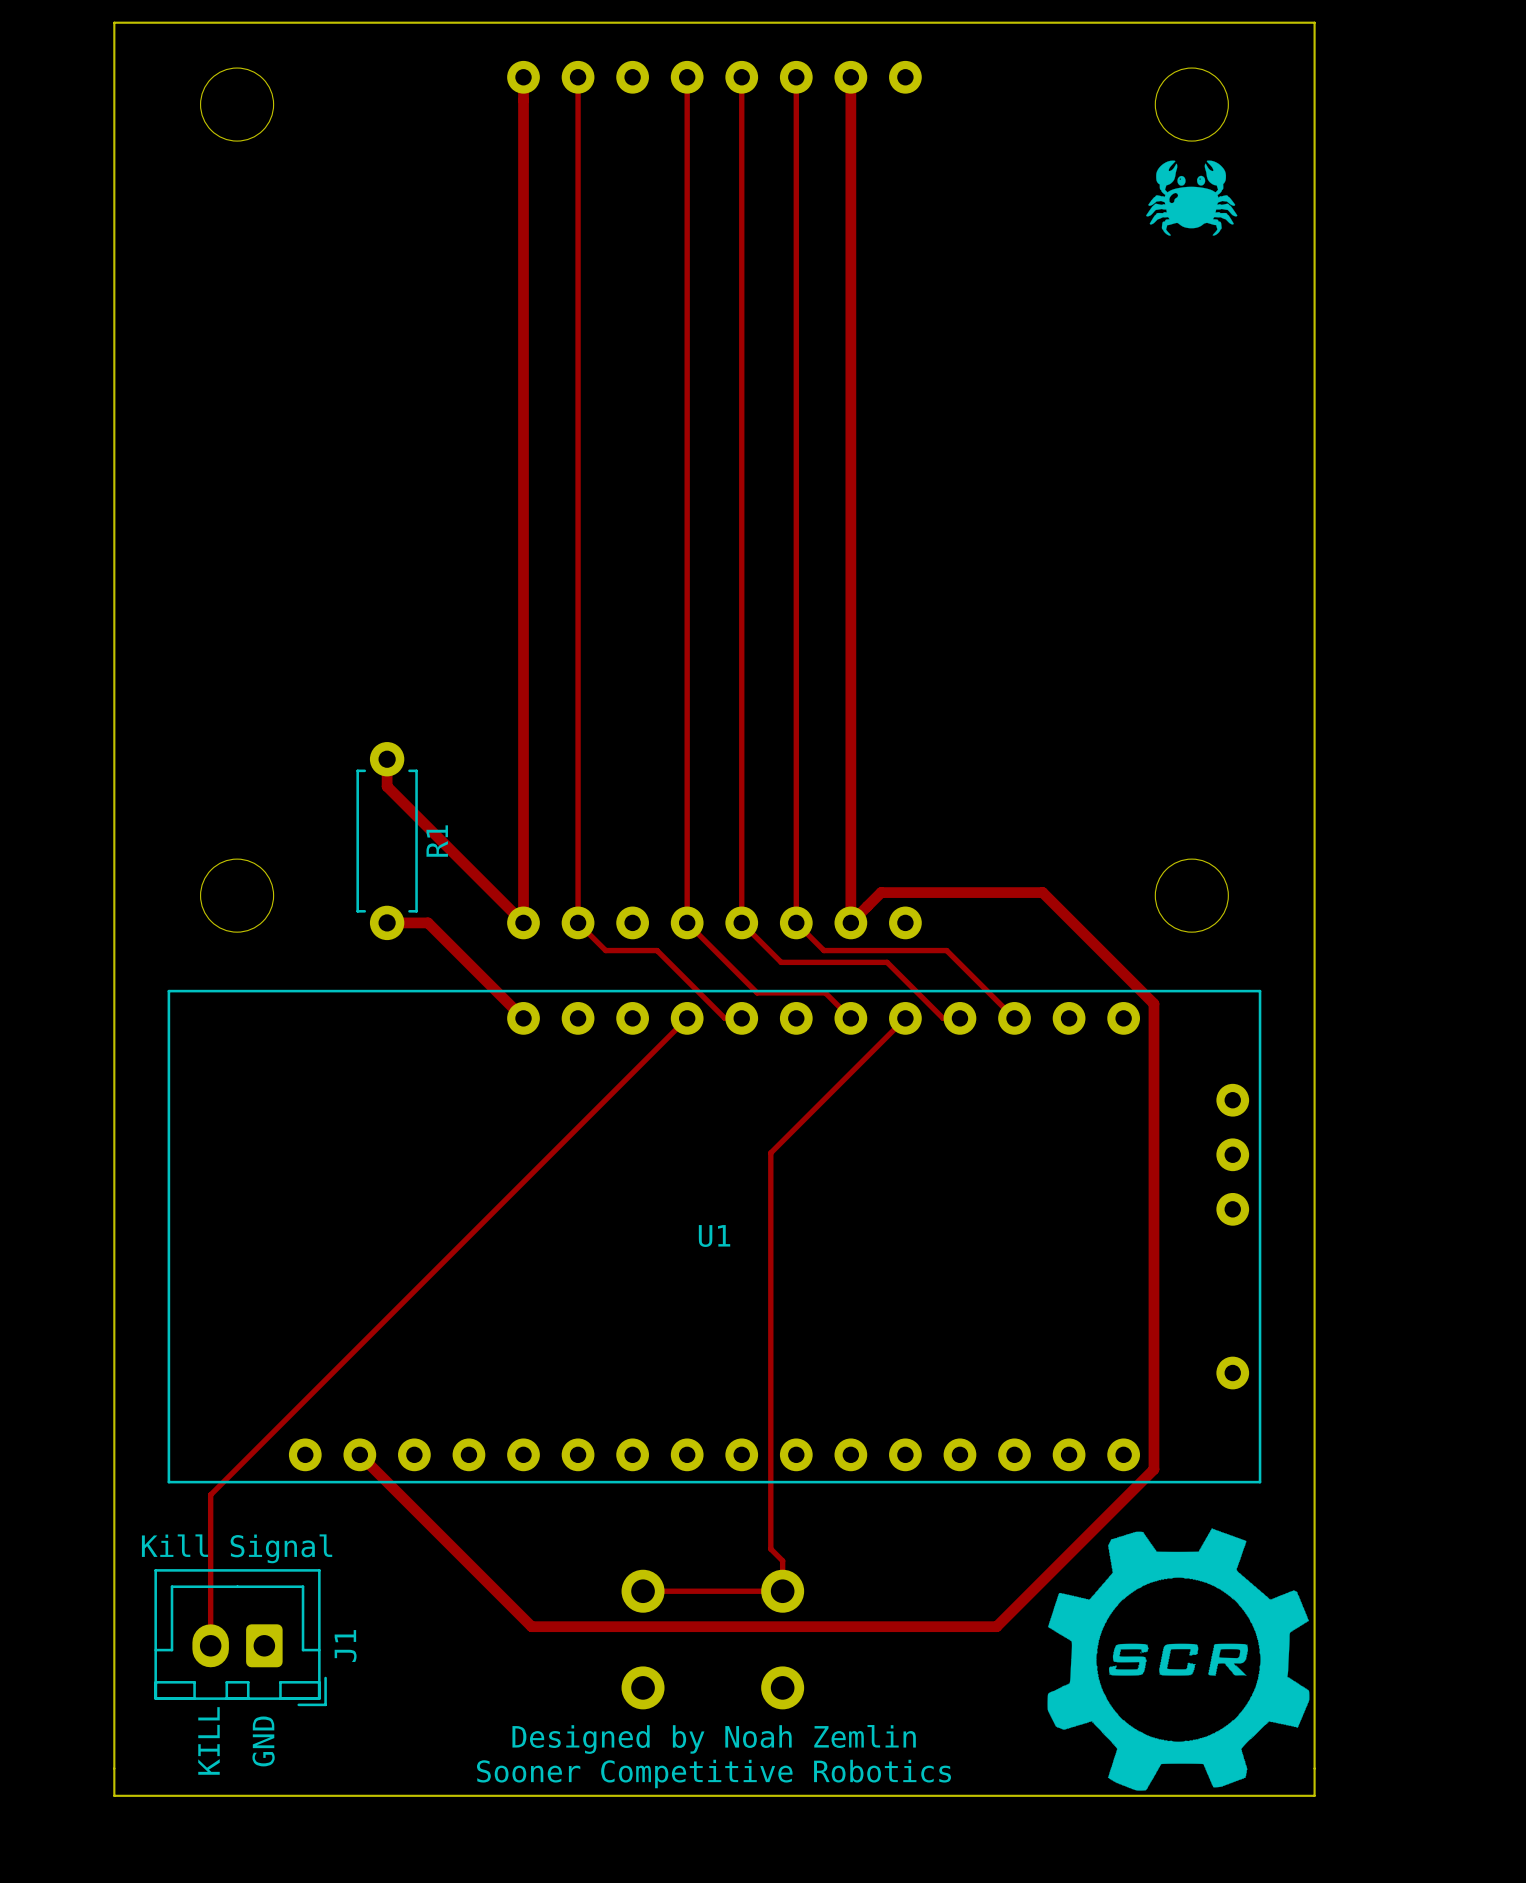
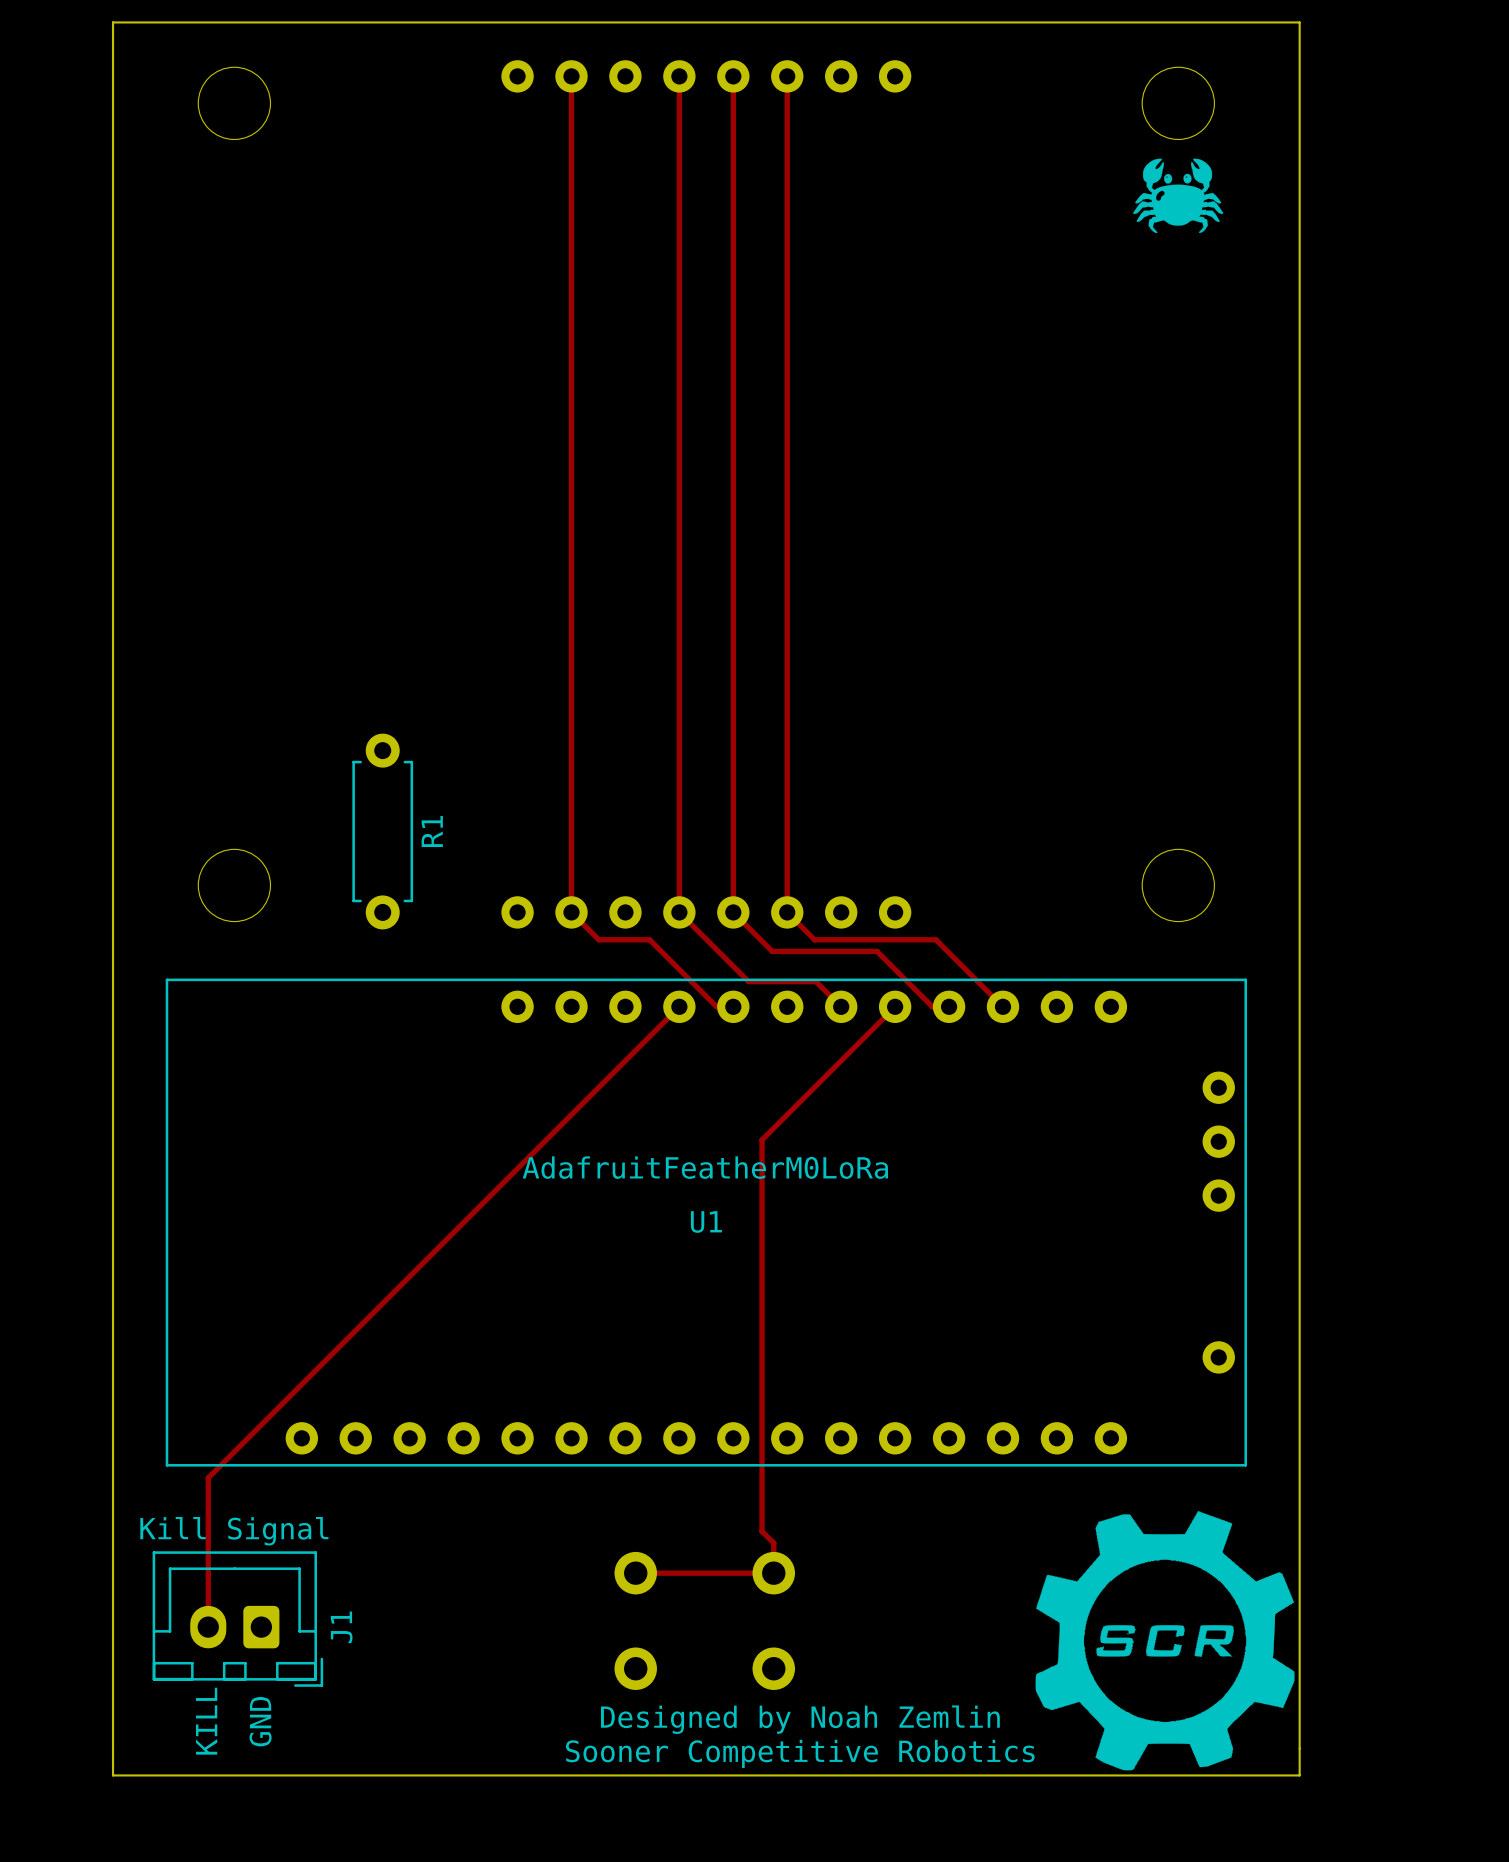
track: (523, 77) (523, 922) (387, 786) (387, 759) -> none
track: (850, 77) (850, 922) (881, 892) (1042, 892) (1153, 1003) (1153, 1469) (996, 1626) (531, 1626) (359, 1454) -> none
track: (387, 922) (428, 922) (523, 1018) -> none
U1 value: none -> AdafruitFeatherM0LoRa (705, 1167)
text position: Designed by Noah Zemlin (714, 1739) -> Designed by Noah Zemlin (800, 1719)
text position: Sooner Competitive Robotics (714, 1774) -> Sooner Competitive Robotics (800, 1753)

